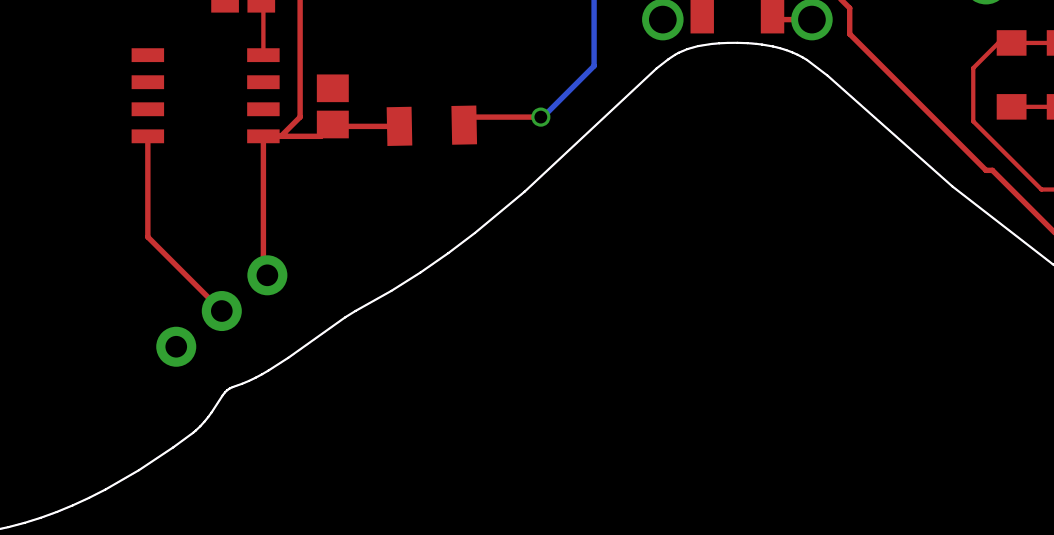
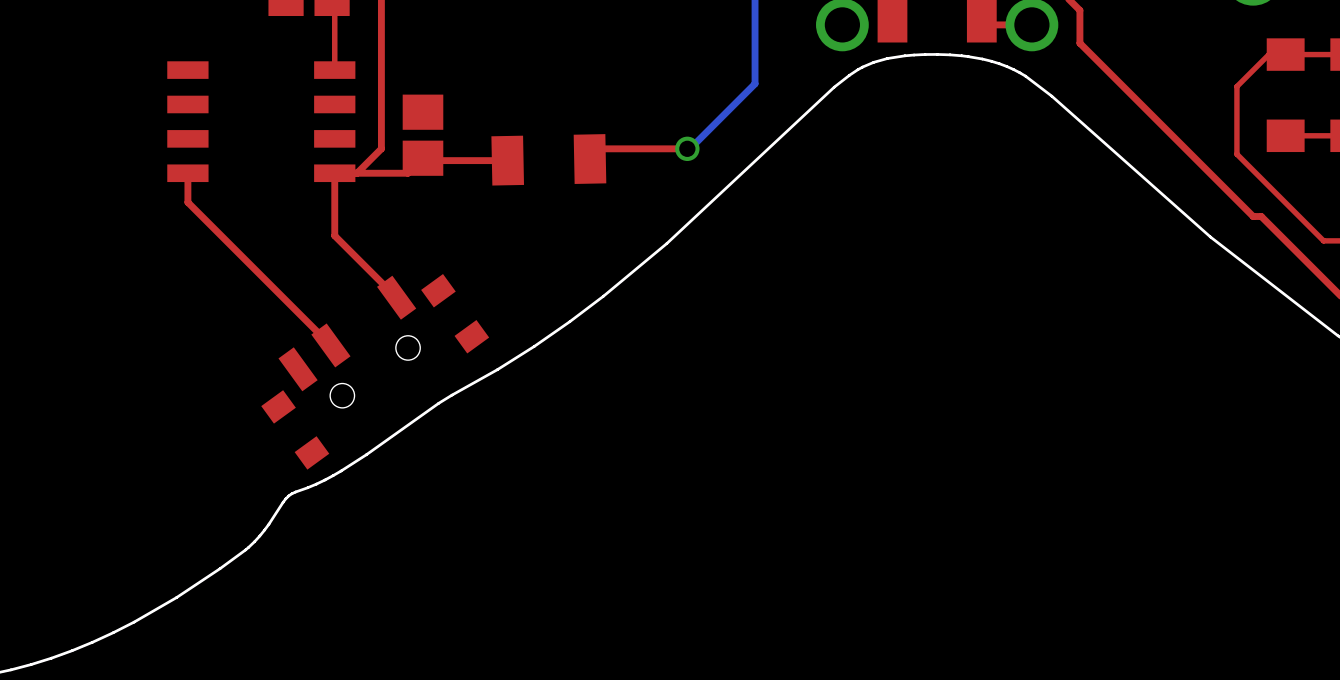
top track: (147, 159) (147, 237) (221, 311) -> (187, 202) (330, 345)
top track: (263, 185) (263, 271) (267, 275) -> (334, 235) (396, 297)
part: none -> (375, 371)
part: (221, 311) -> none

